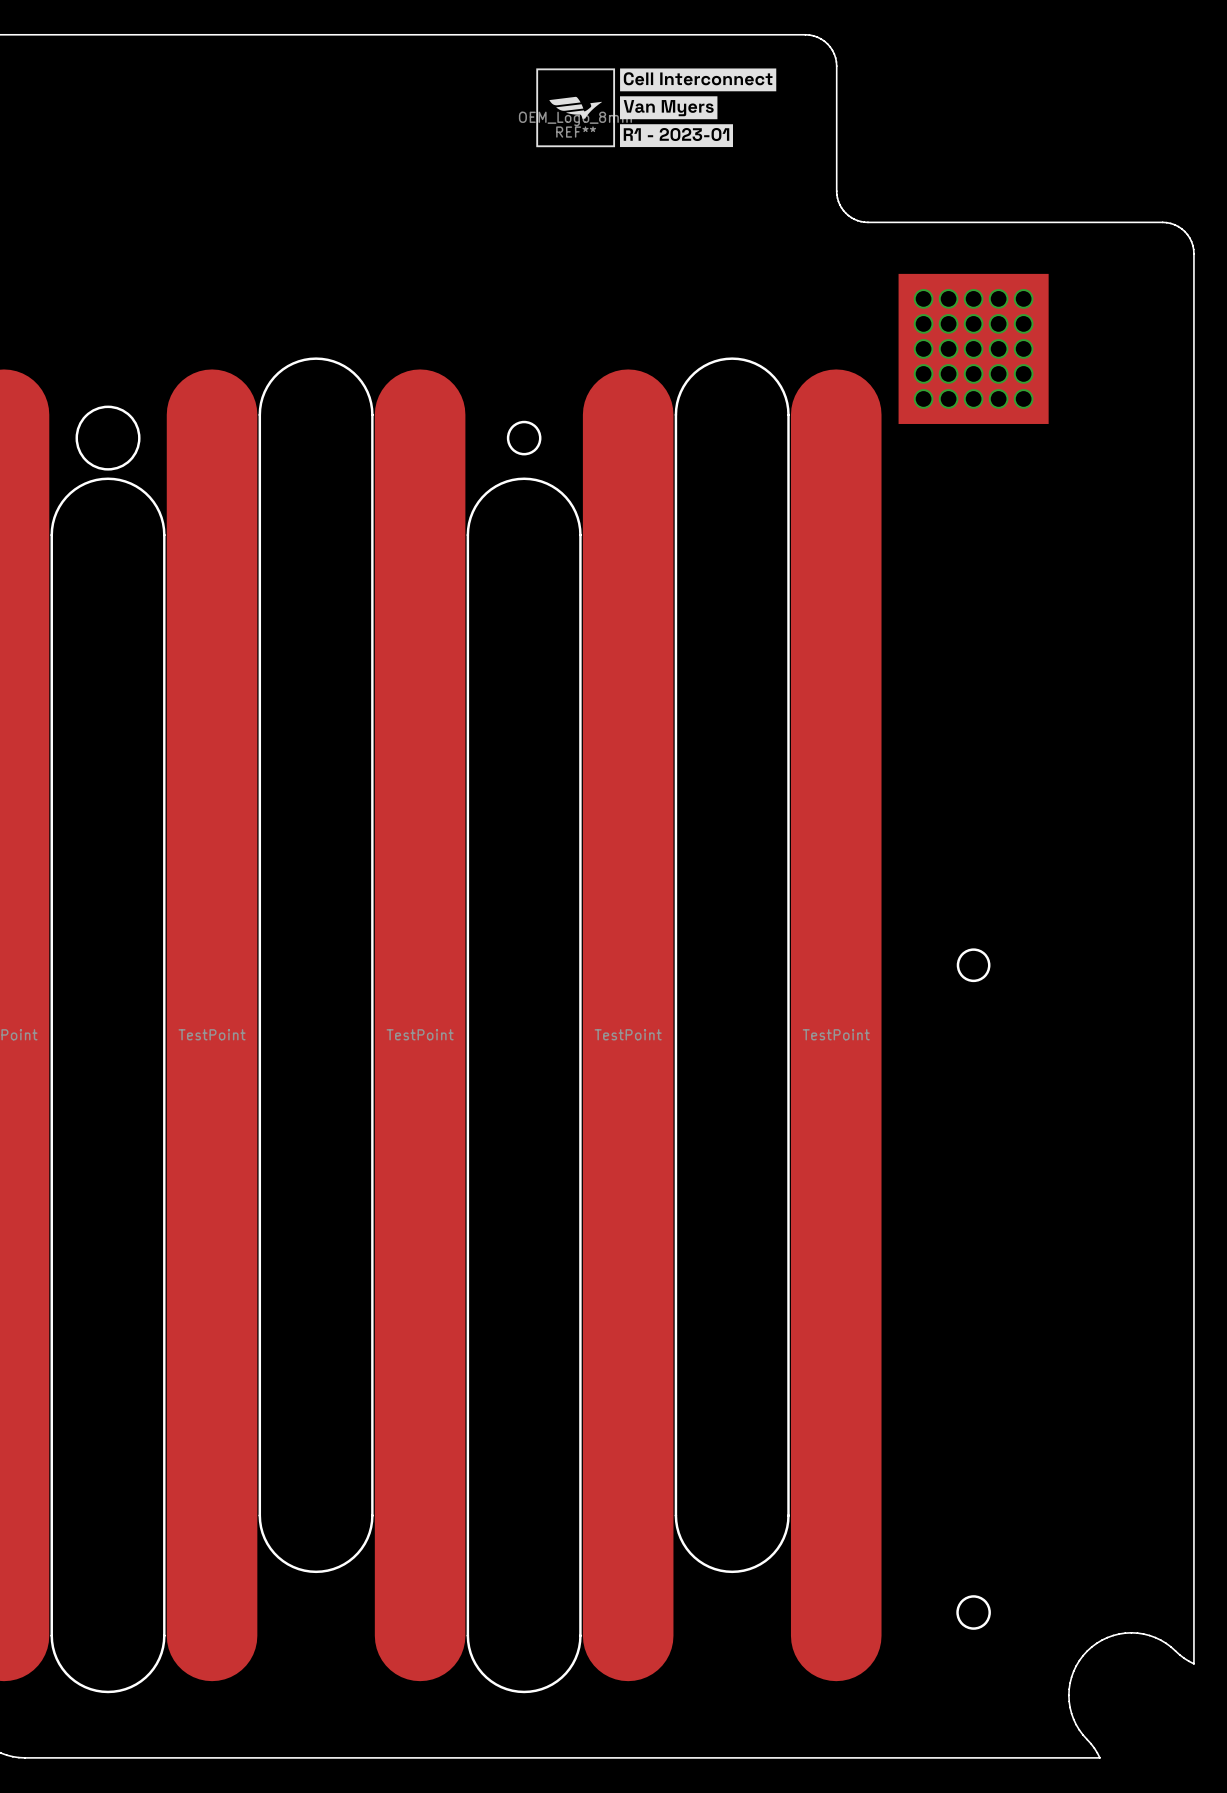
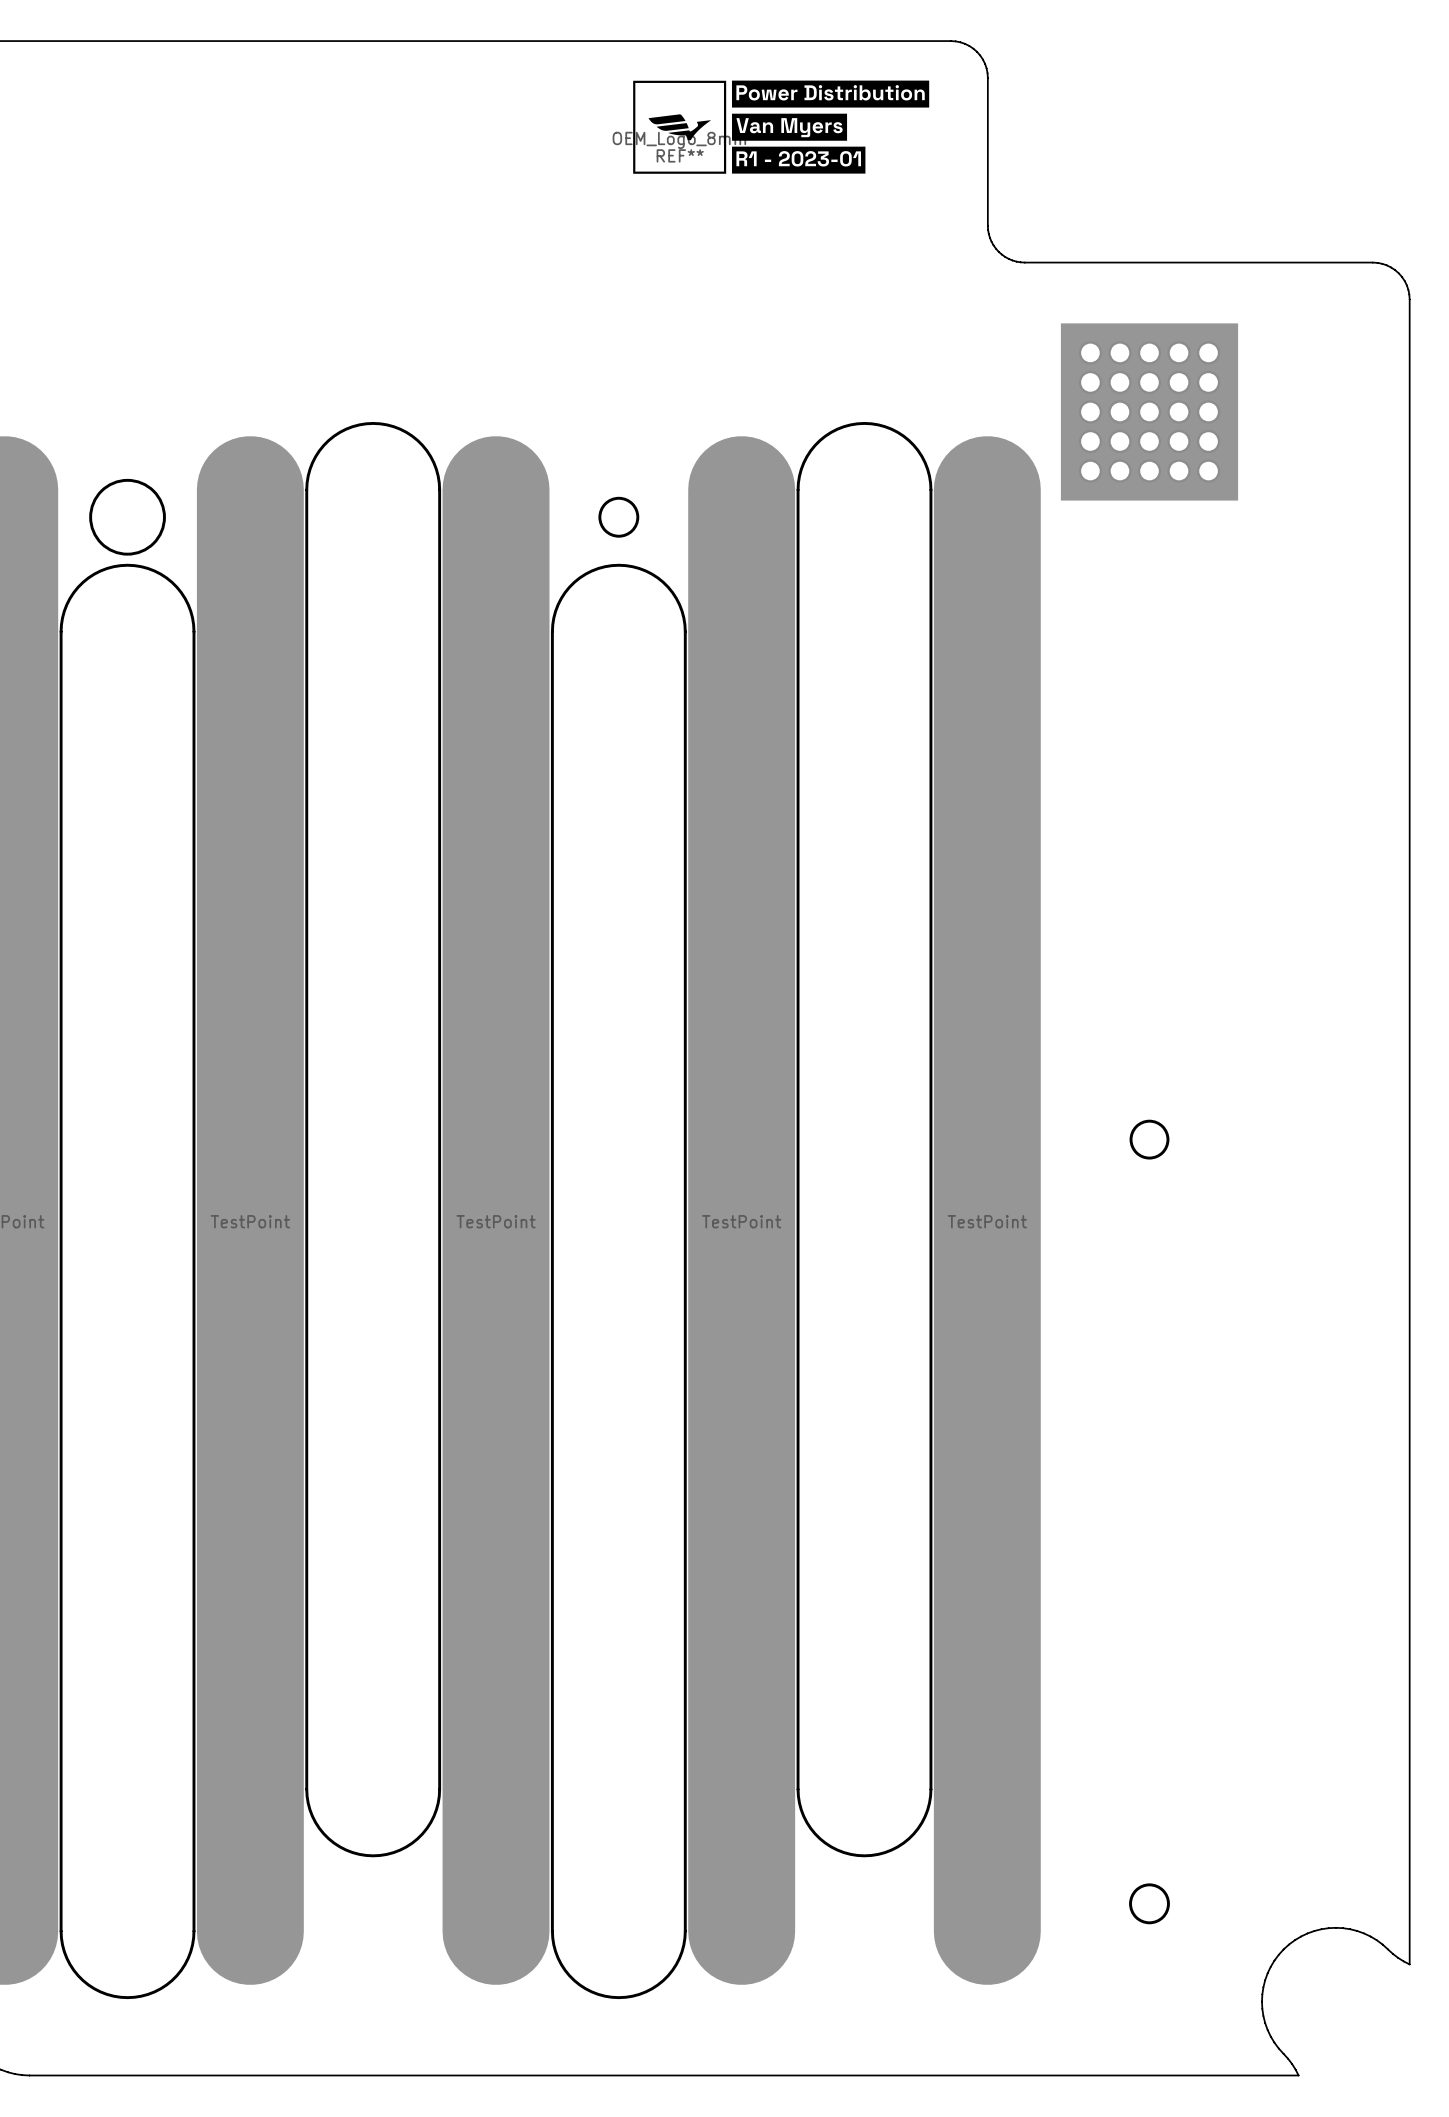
drawing shape: [620, 68, 777, 92] -> [731, 80, 930, 108]

